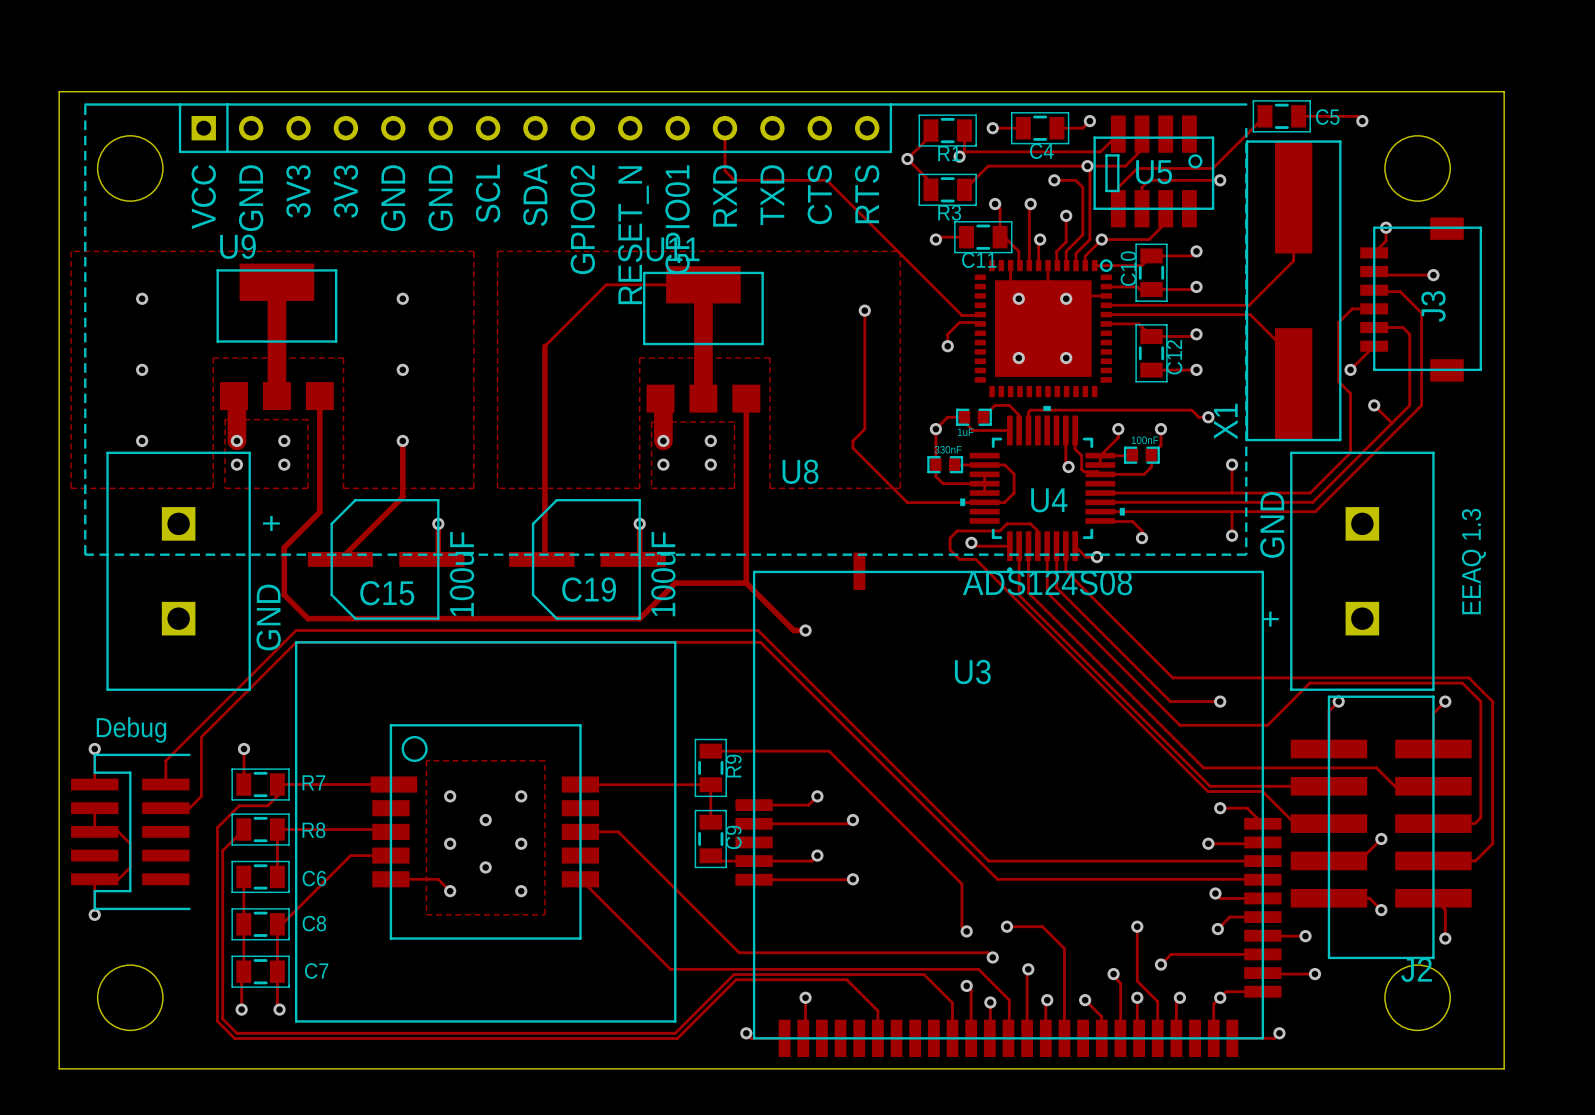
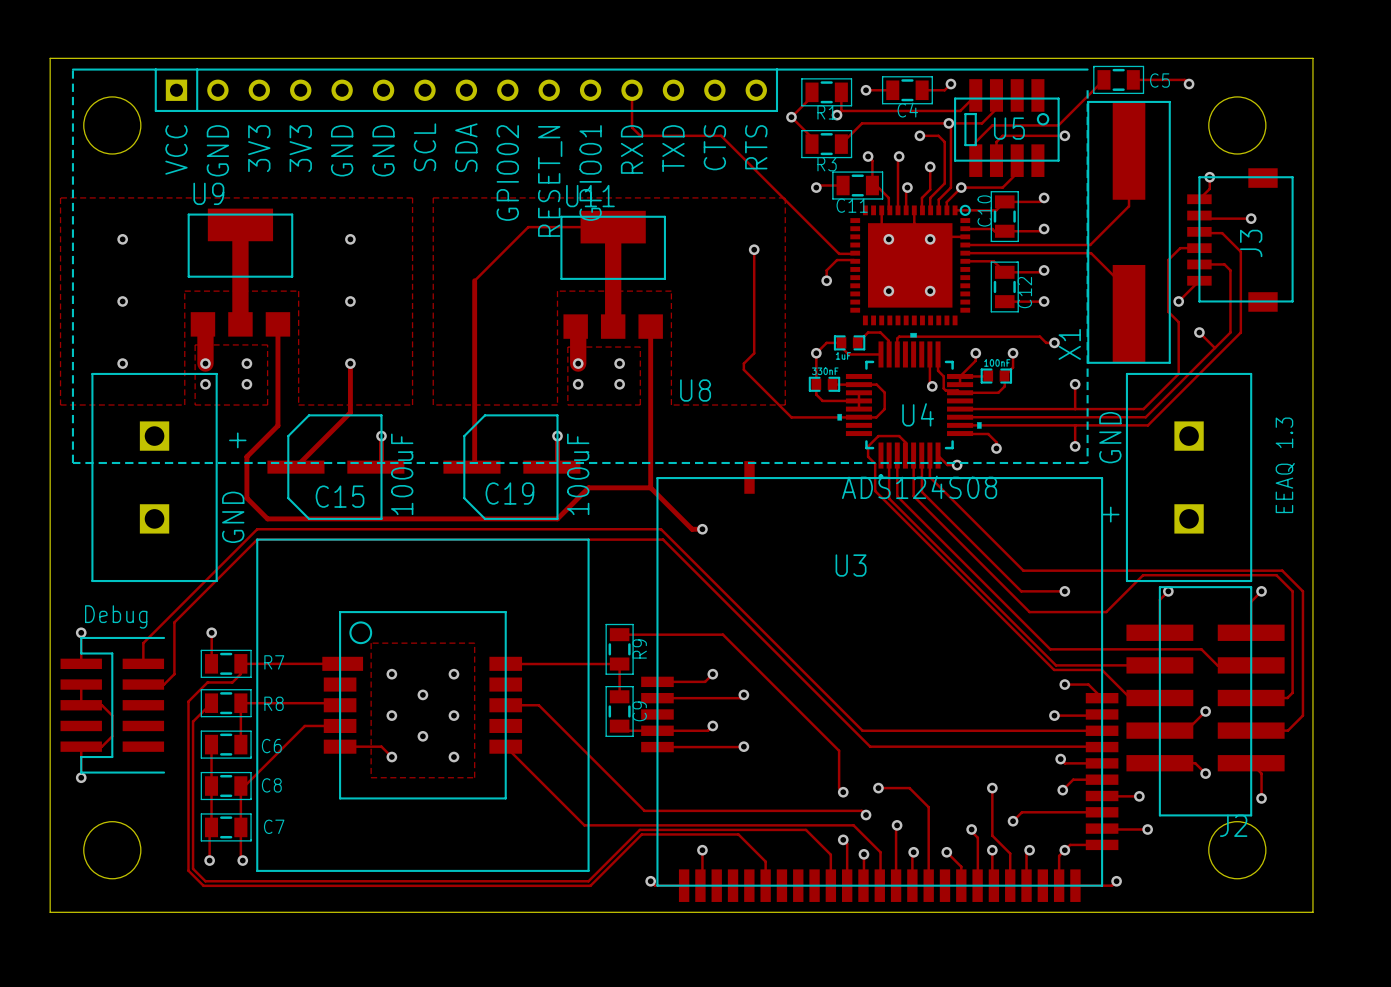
track: (999, 530) (957, 530) (950, 538) (950, 549) (959, 559) (975, 559) (1003, 586) -> (872, 442) (868, 446) (868, 456) (875, 463) (875, 491)
track: (971, 542) (974, 546) (1009, 546) -> none
via: (971, 542) -> none

